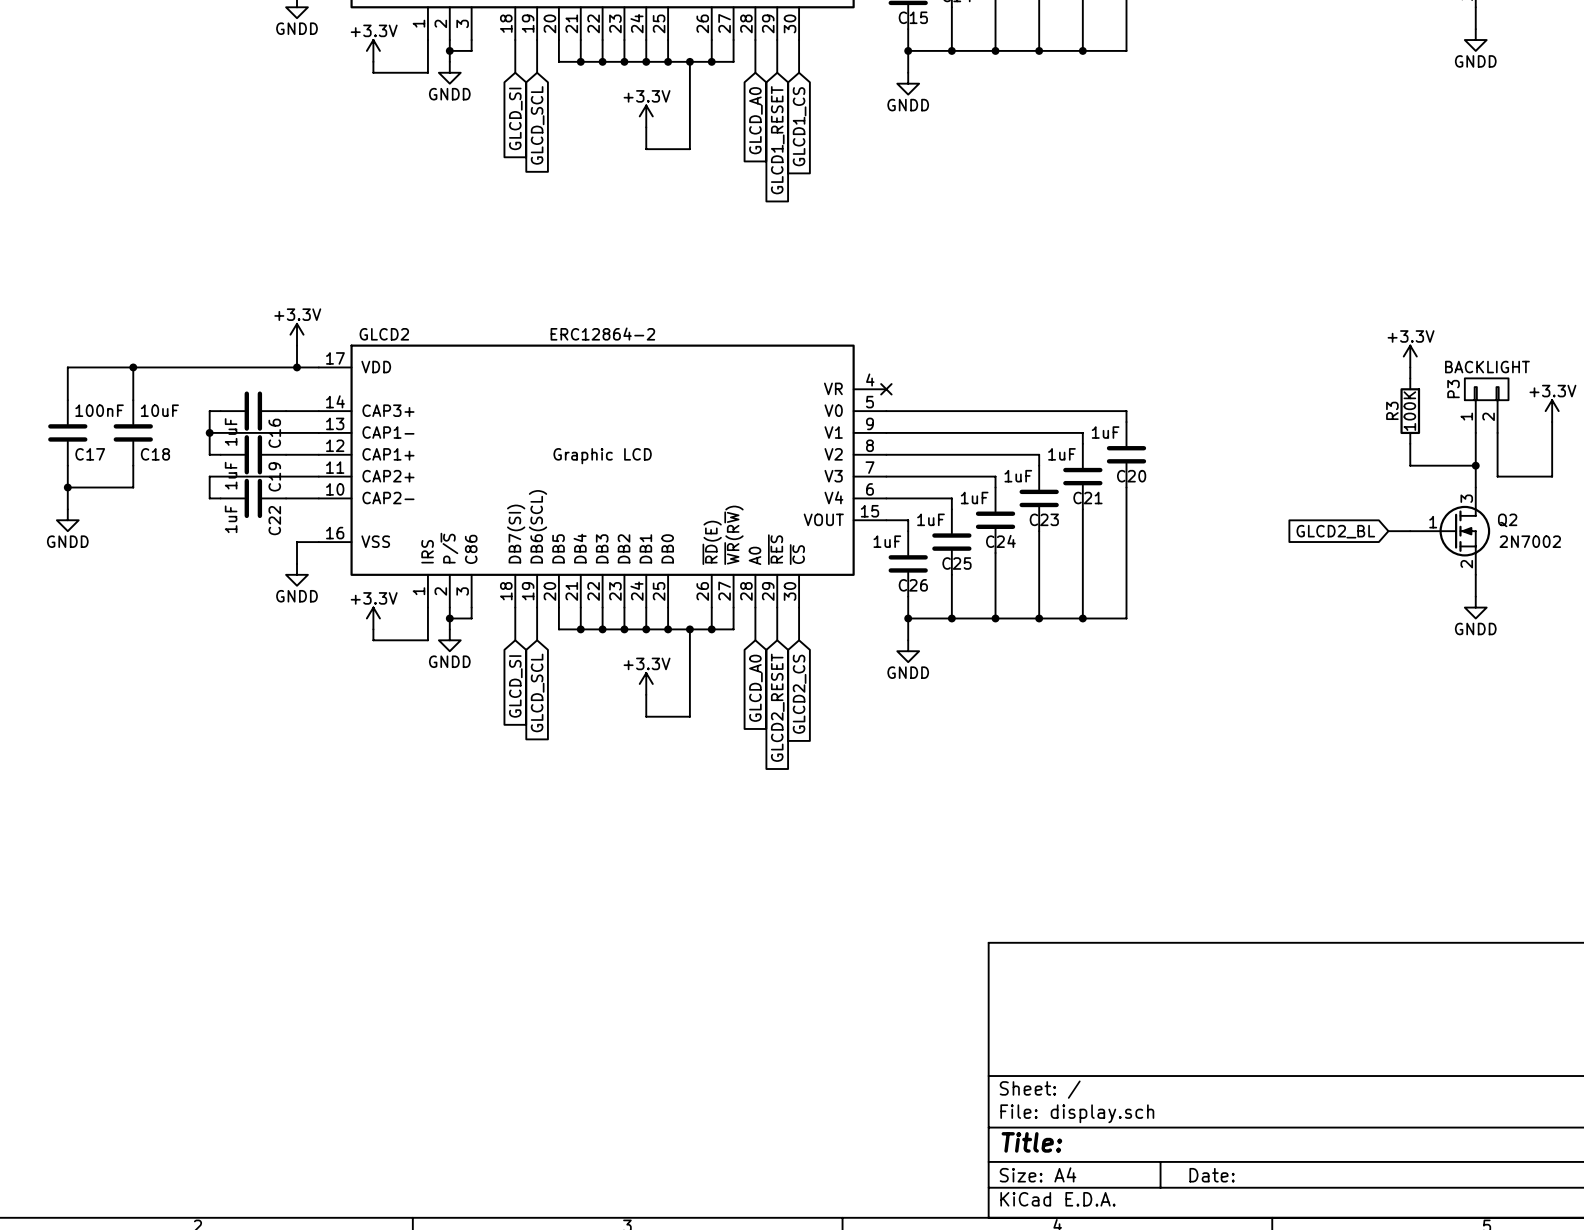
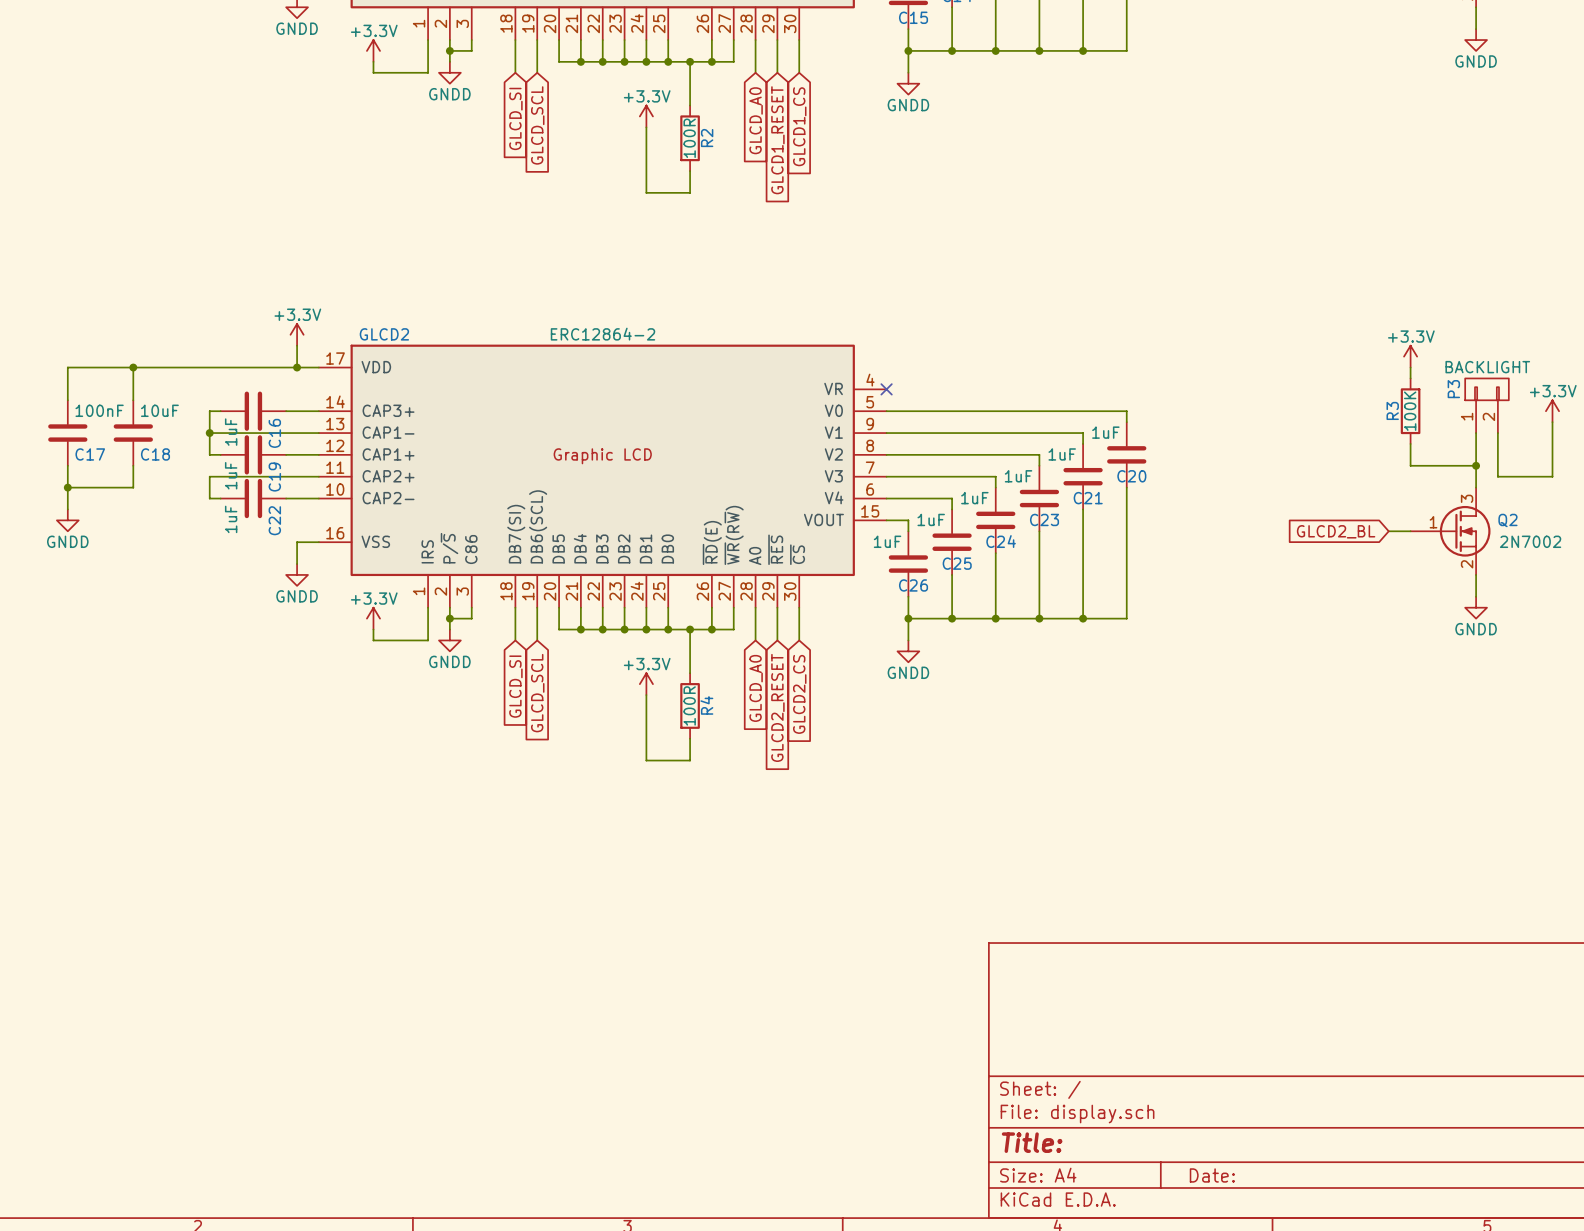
wire: (689, 105) (689, 149) (646, 149) -> (690, 171) (690, 192) (646, 192) (646, 149)
R2: none -> 100R (690, 138)
wire: (689, 673) (689, 716) (646, 716) -> (690, 738) (690, 760) (646, 760) (646, 716)
R4: none -> 100R (690, 705)

